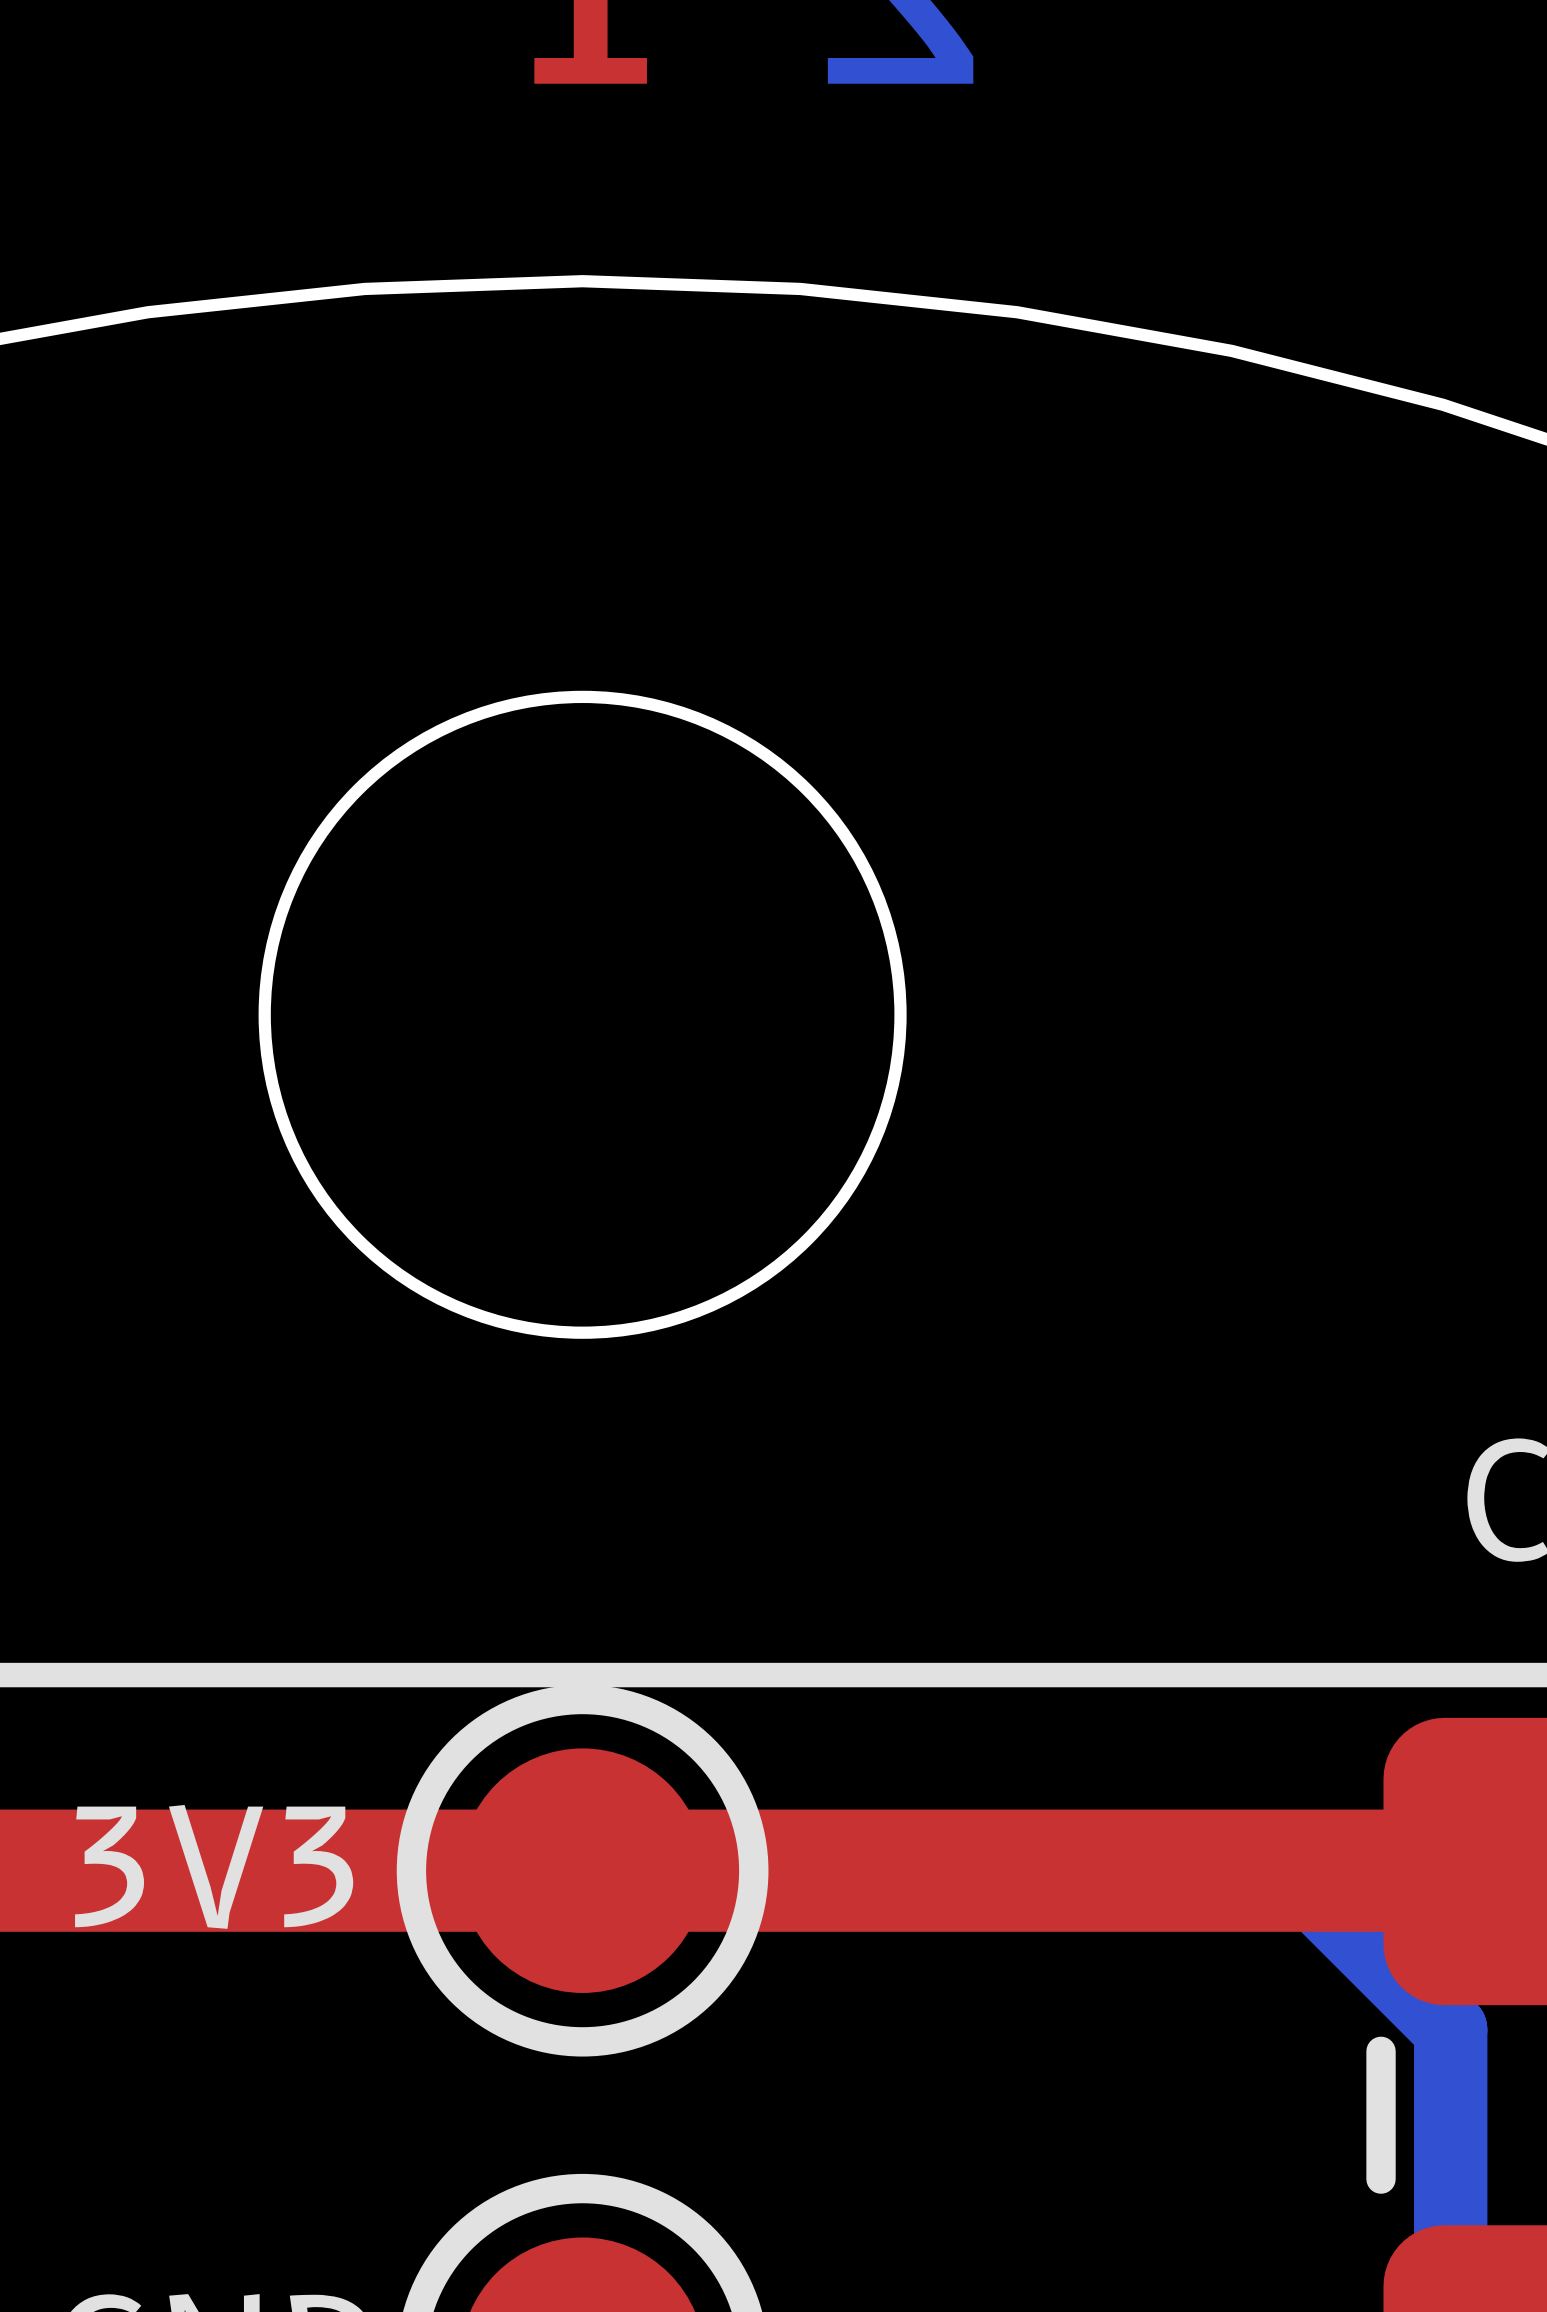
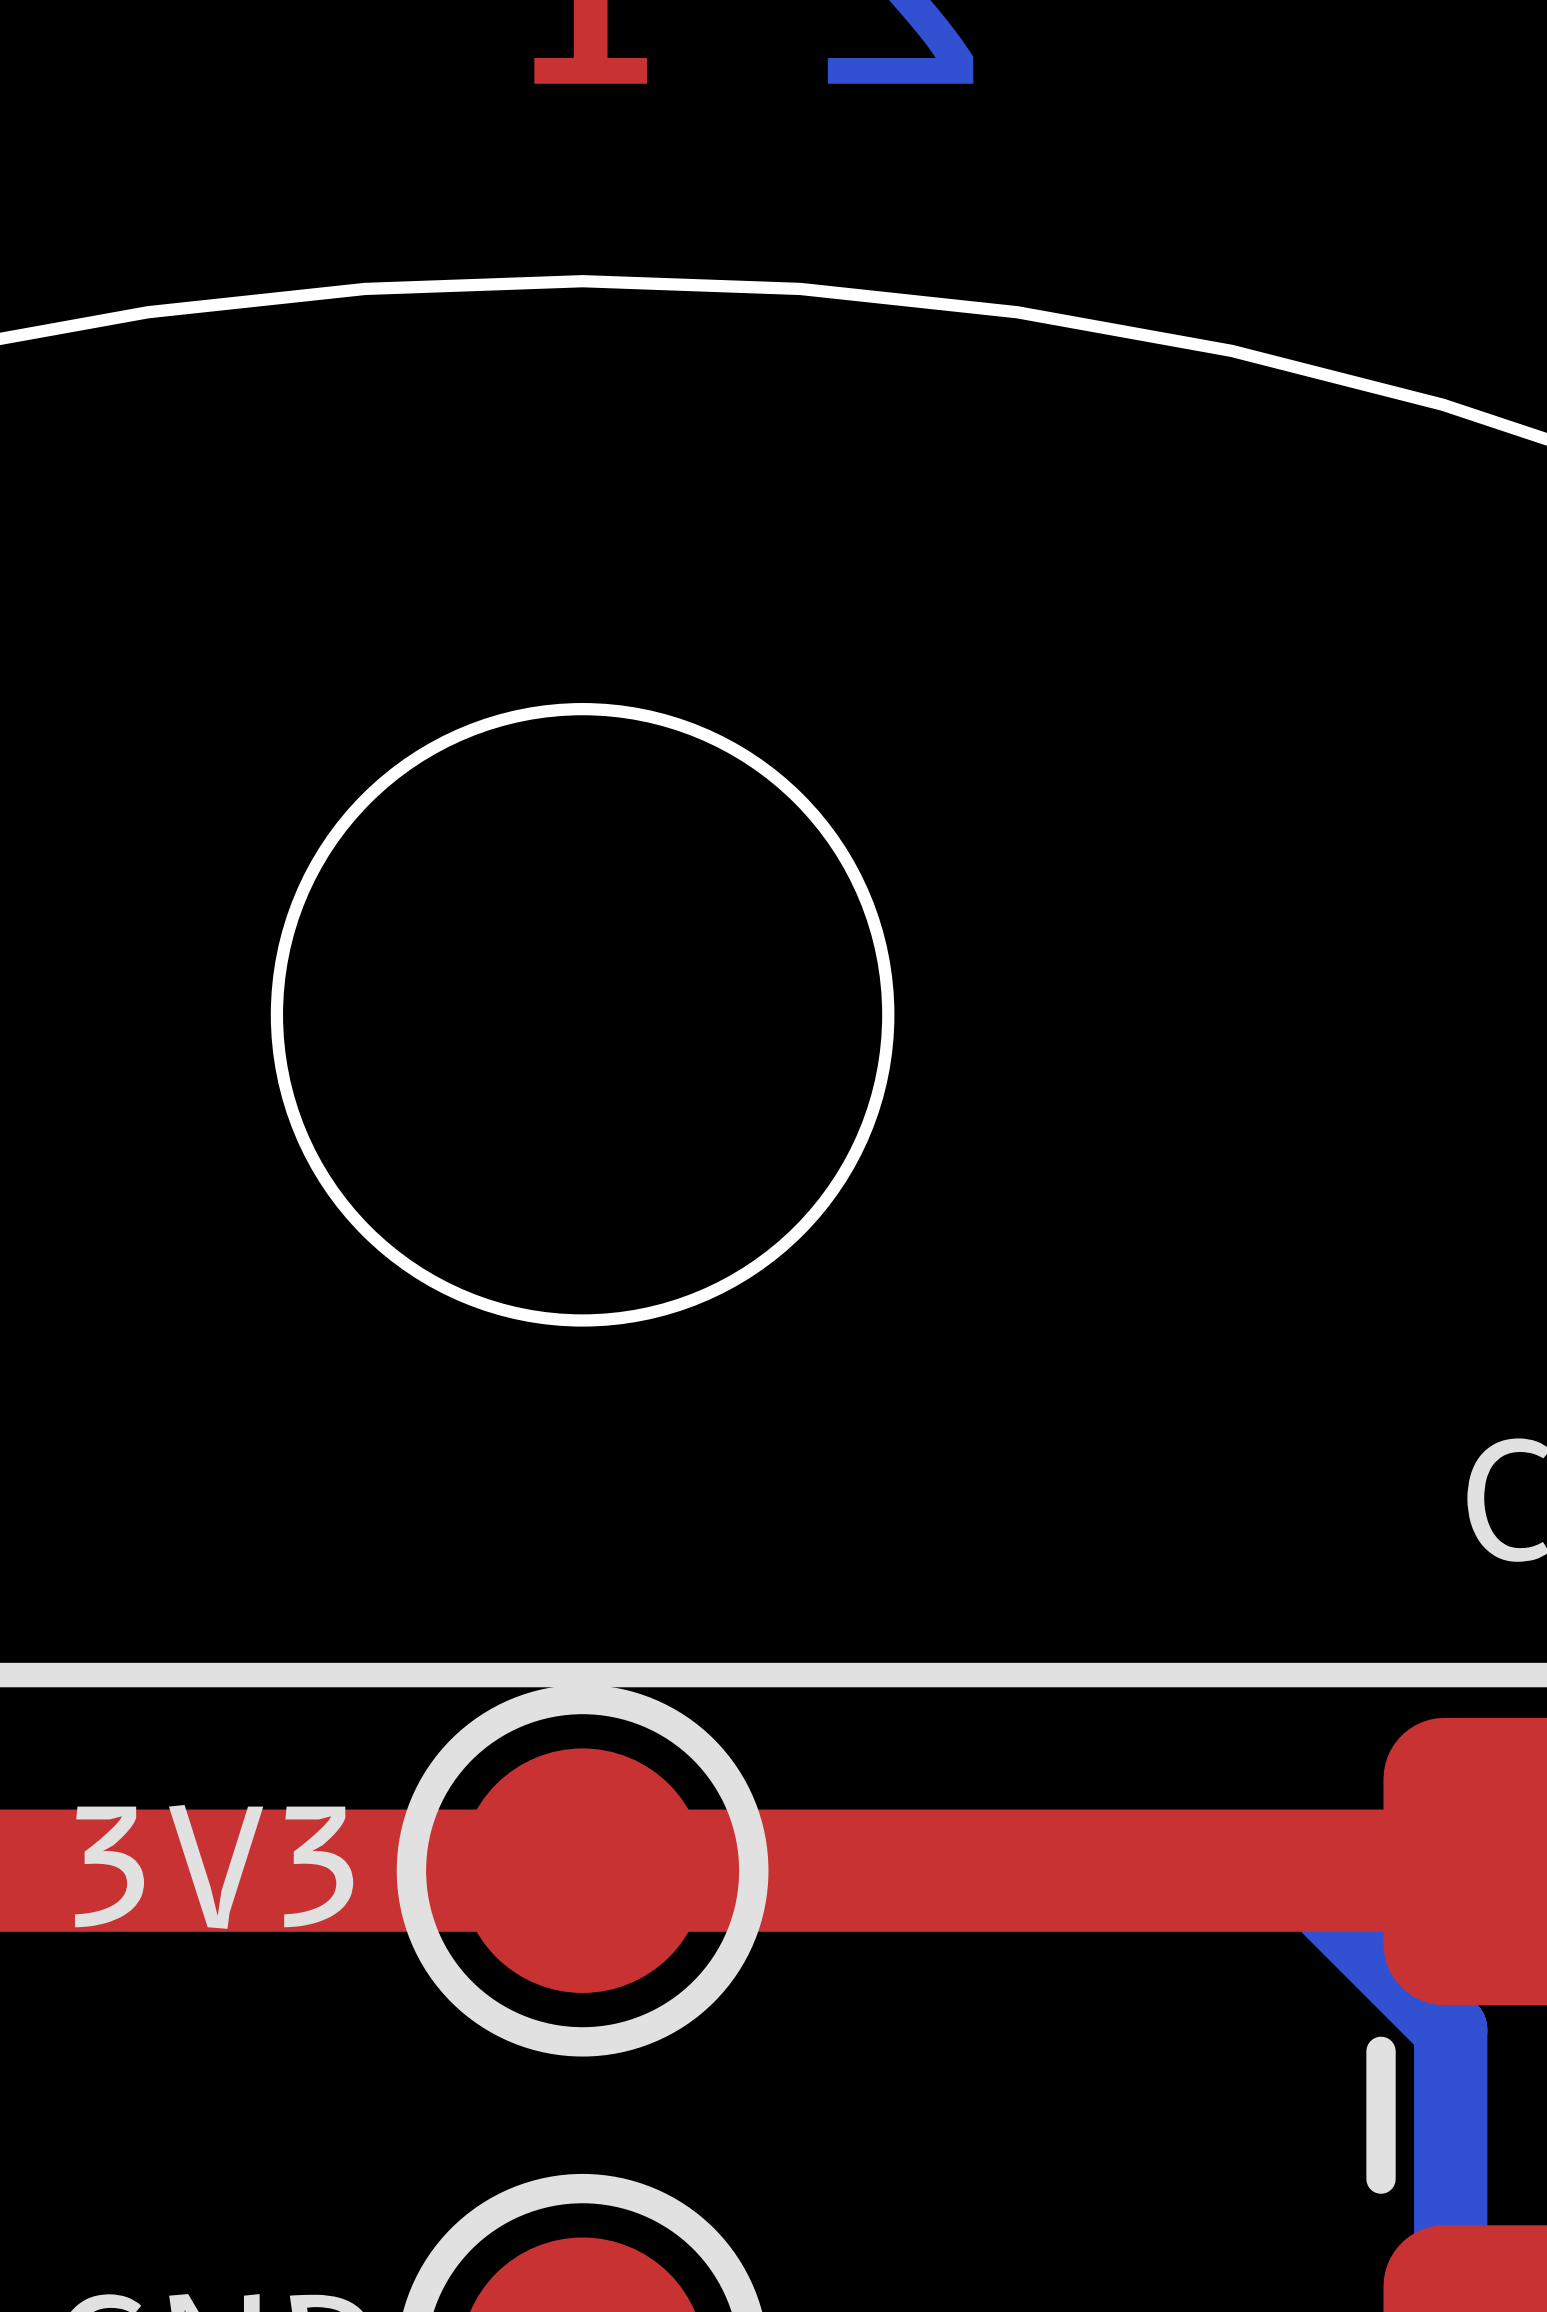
round board edge size: [258, 690, 907, 1339] -> [270, 703, 895, 1327]

